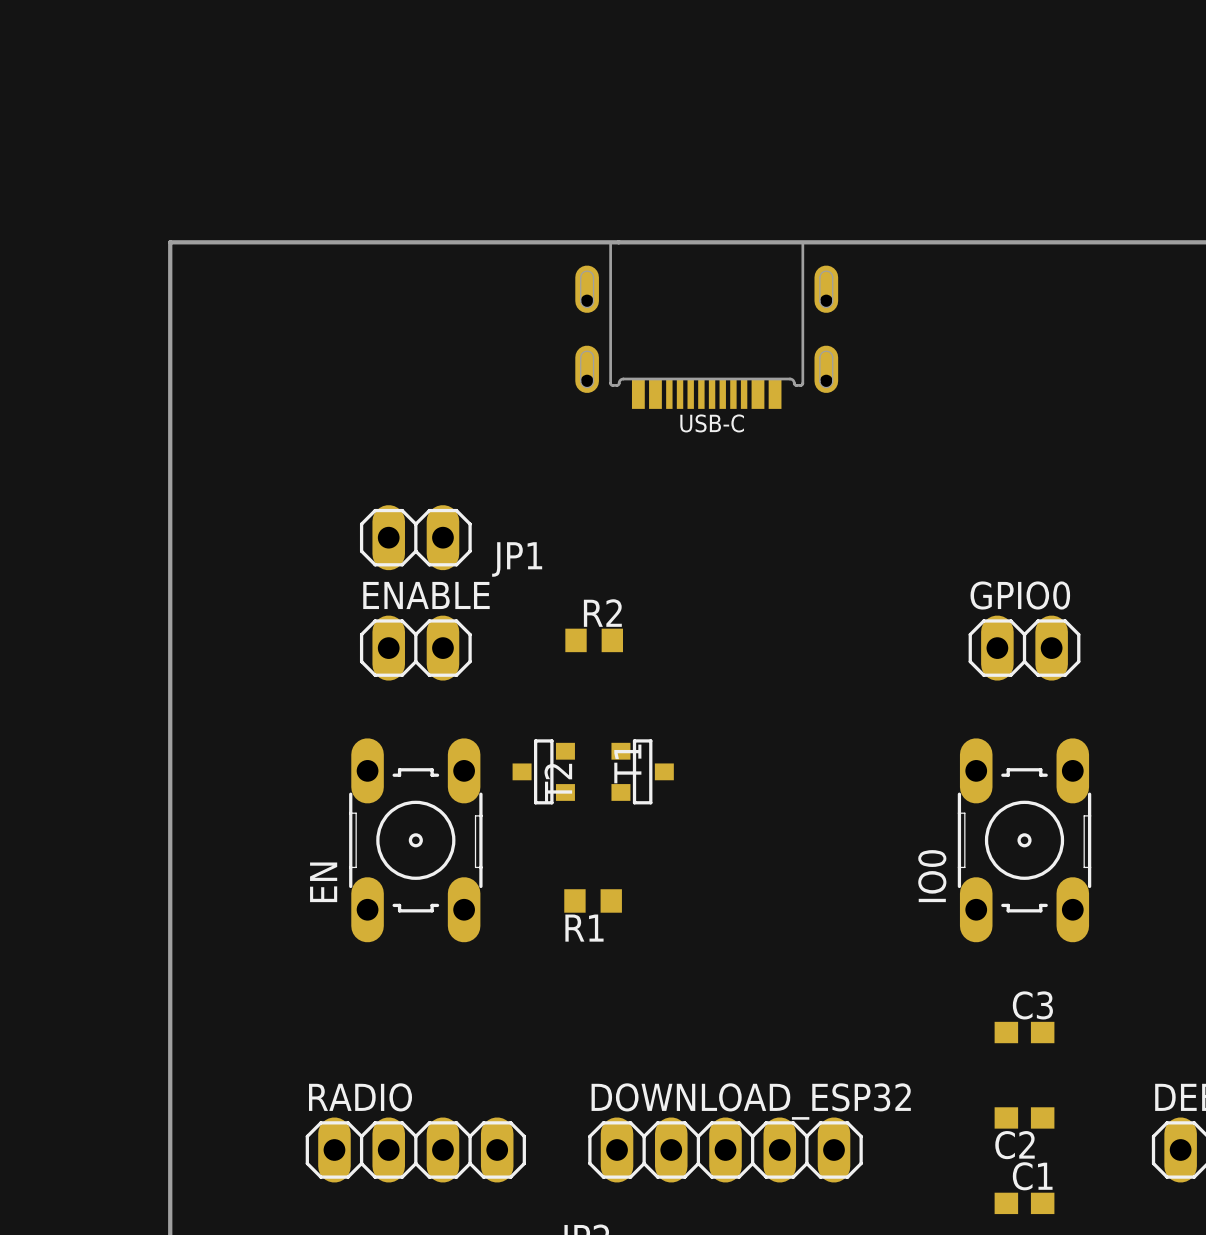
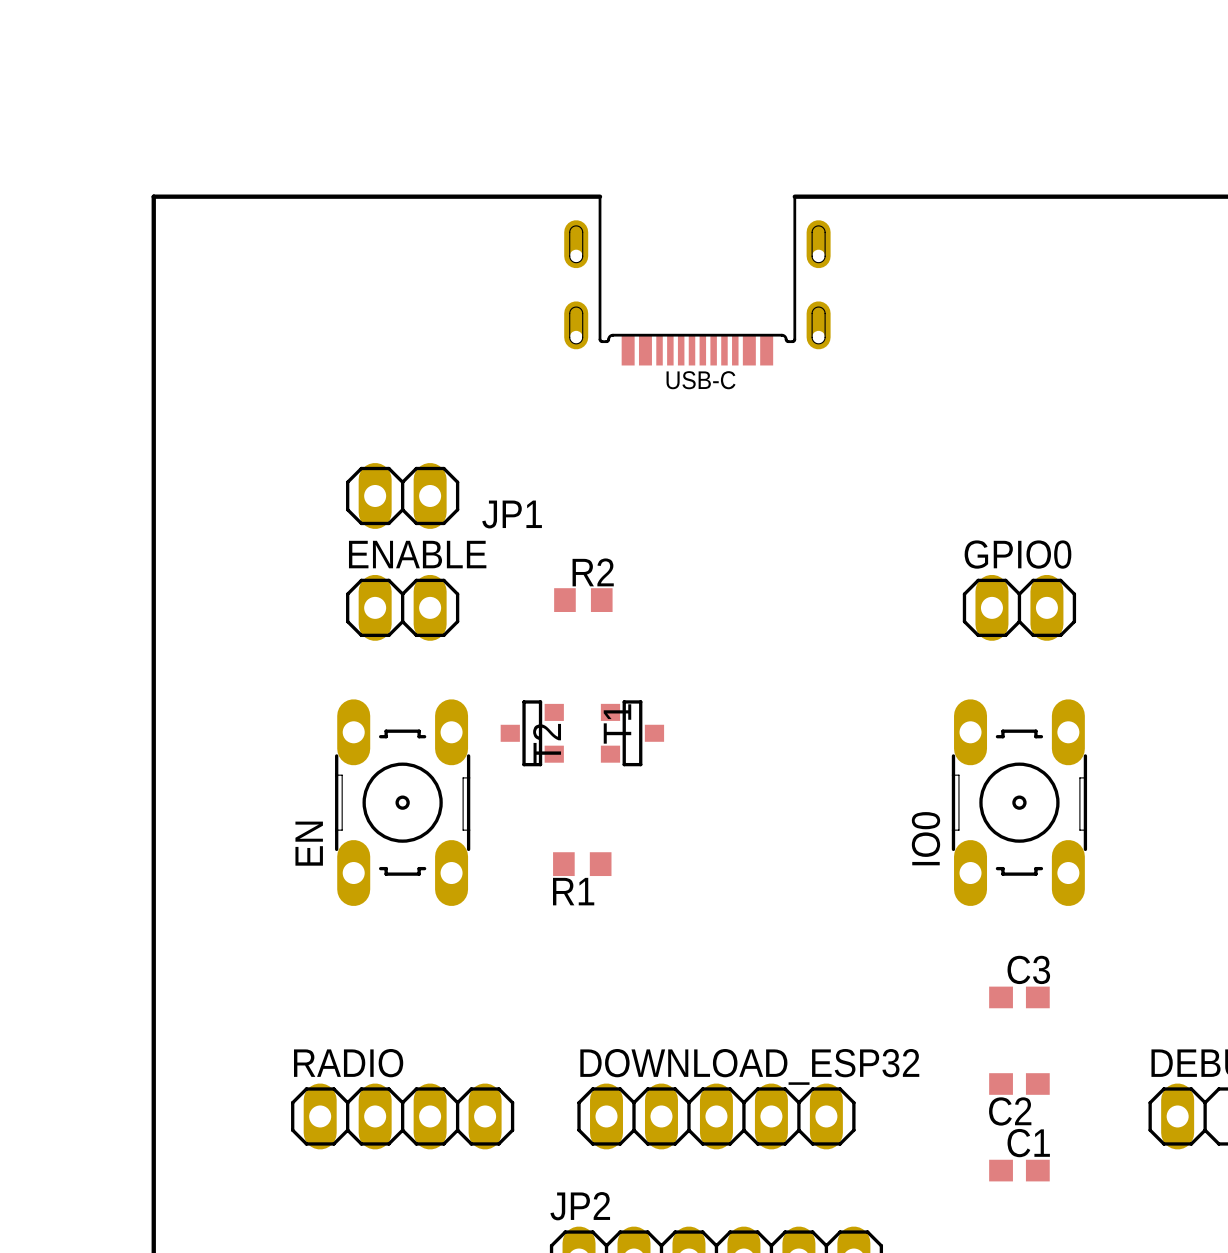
board edge: (610, 242) (802, 242) -> none

